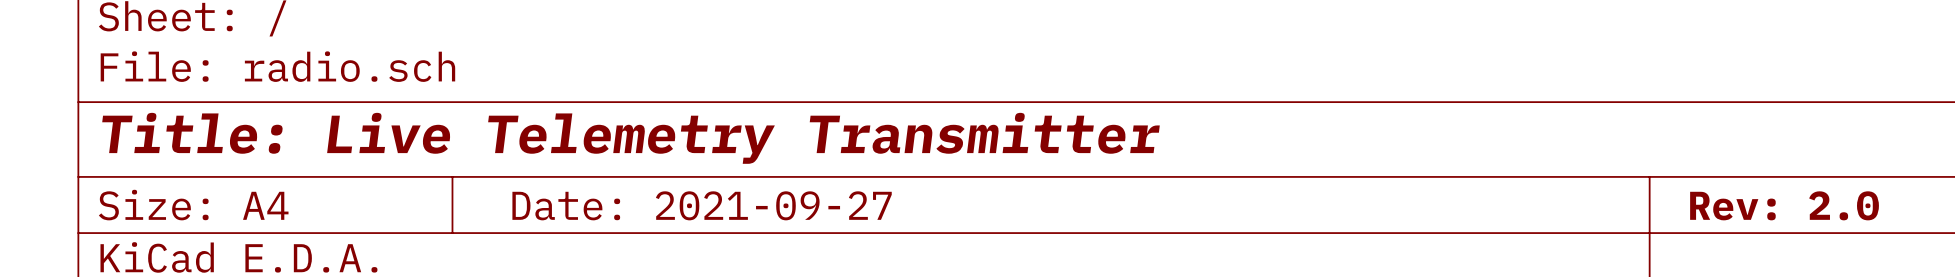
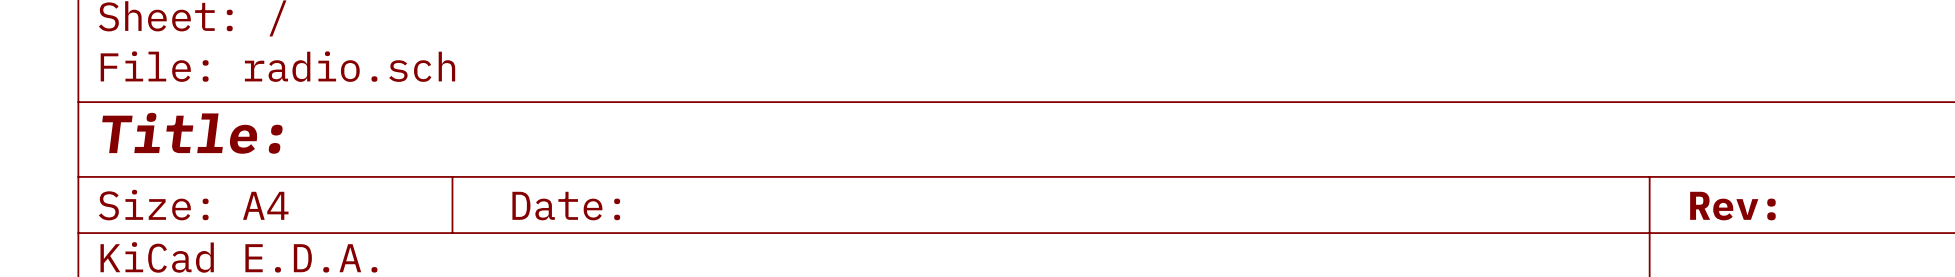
title block: Title: Live Telemetry Transmitter (631, 138) -> Title: (192, 133)
title block: Date: 2021-09-27 (702, 205) -> Date: (566, 206)
title block: Rev: 2.0 (1784, 205) -> Rev: (1732, 206)

